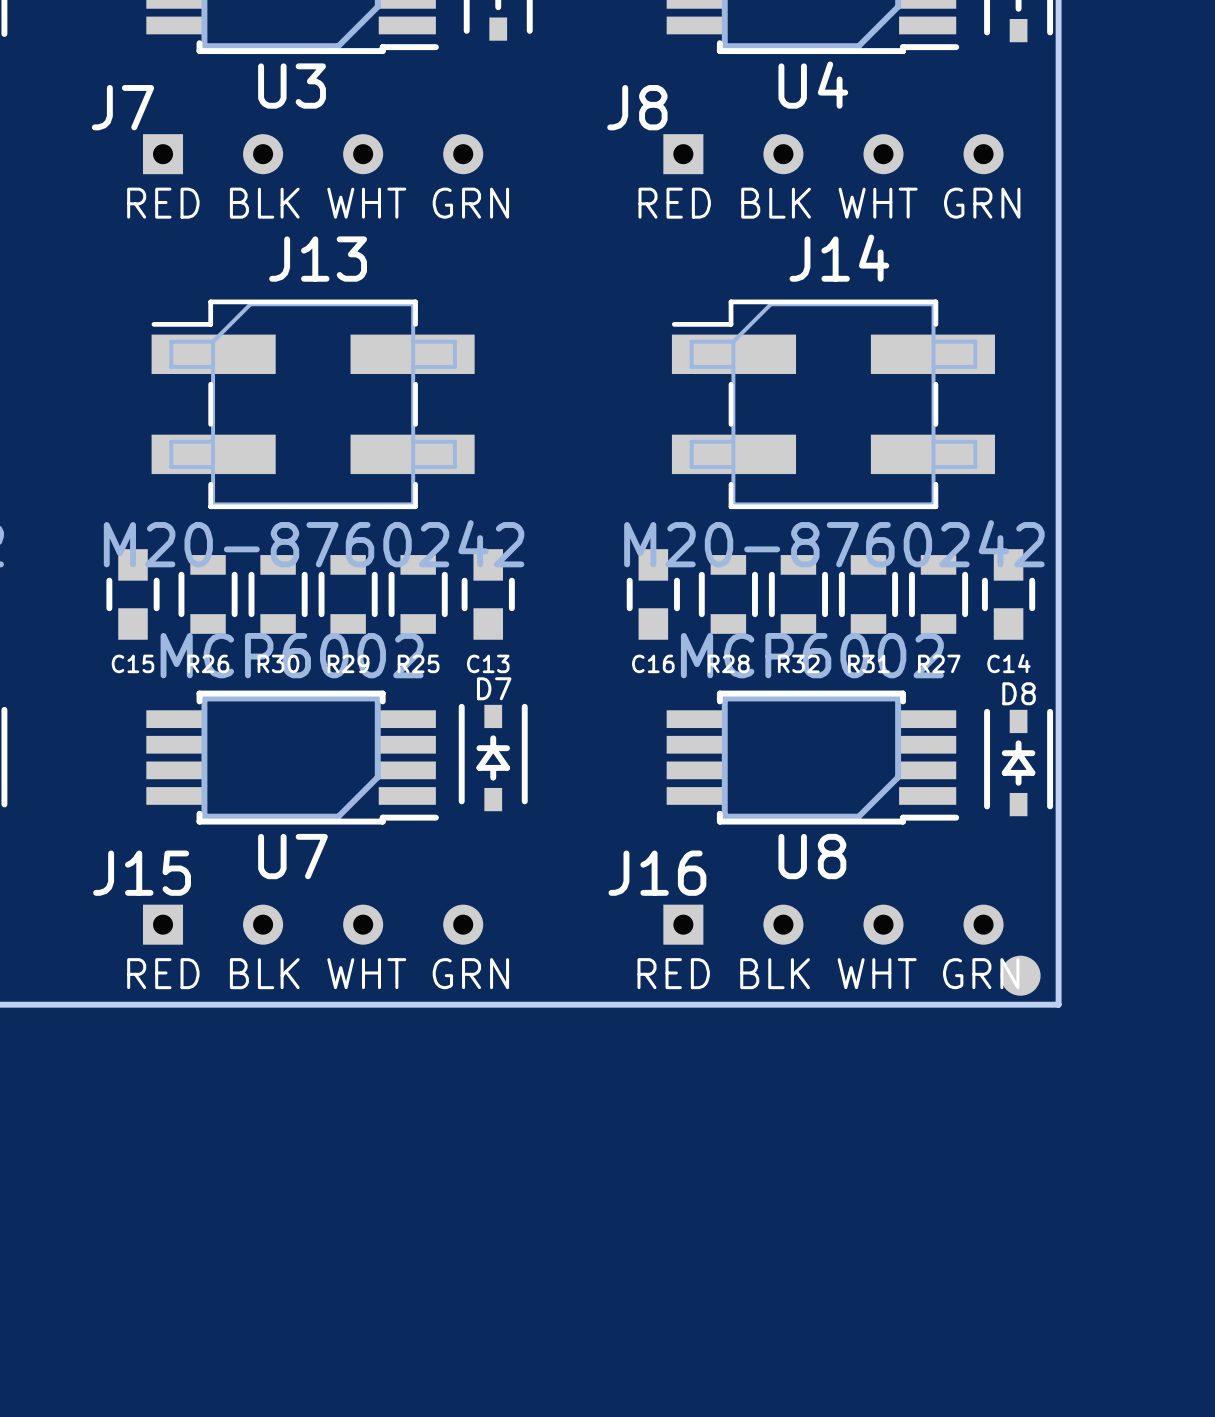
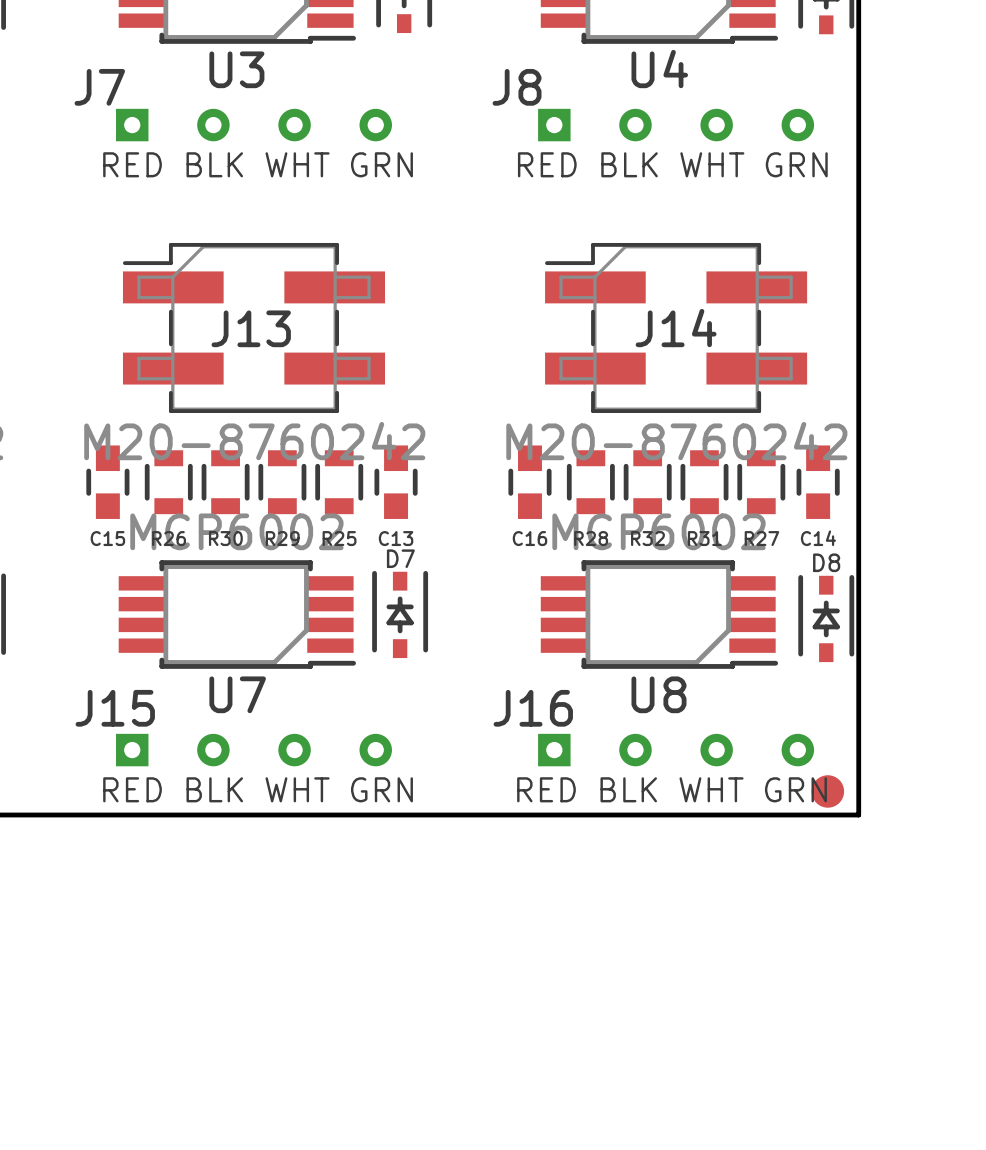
J14 name position: J14 (839, 258) -> J14 (676, 328)
J13 name position: J13 (318, 259) -> J13 (251, 328)

